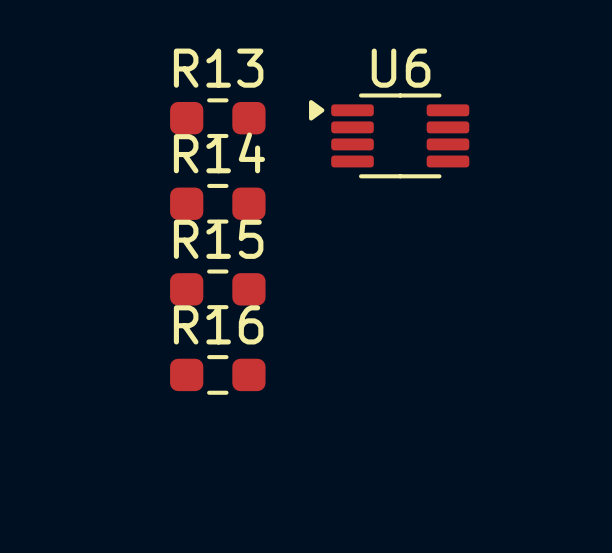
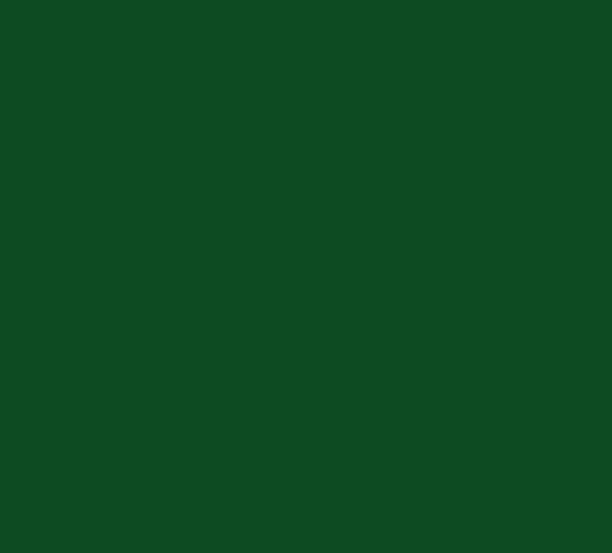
R13: (217, 118) -> none
U6: (389, 135) -> none
R14: (217, 203) -> none
R15: (217, 289) -> none
R16: (217, 374) -> none

